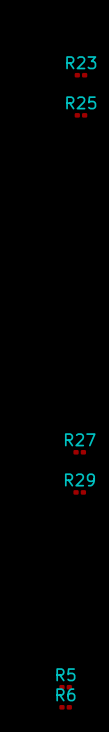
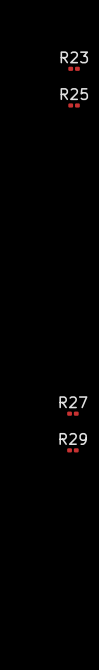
R5: (65, 687) -> none
R6: (65, 707) -> none

